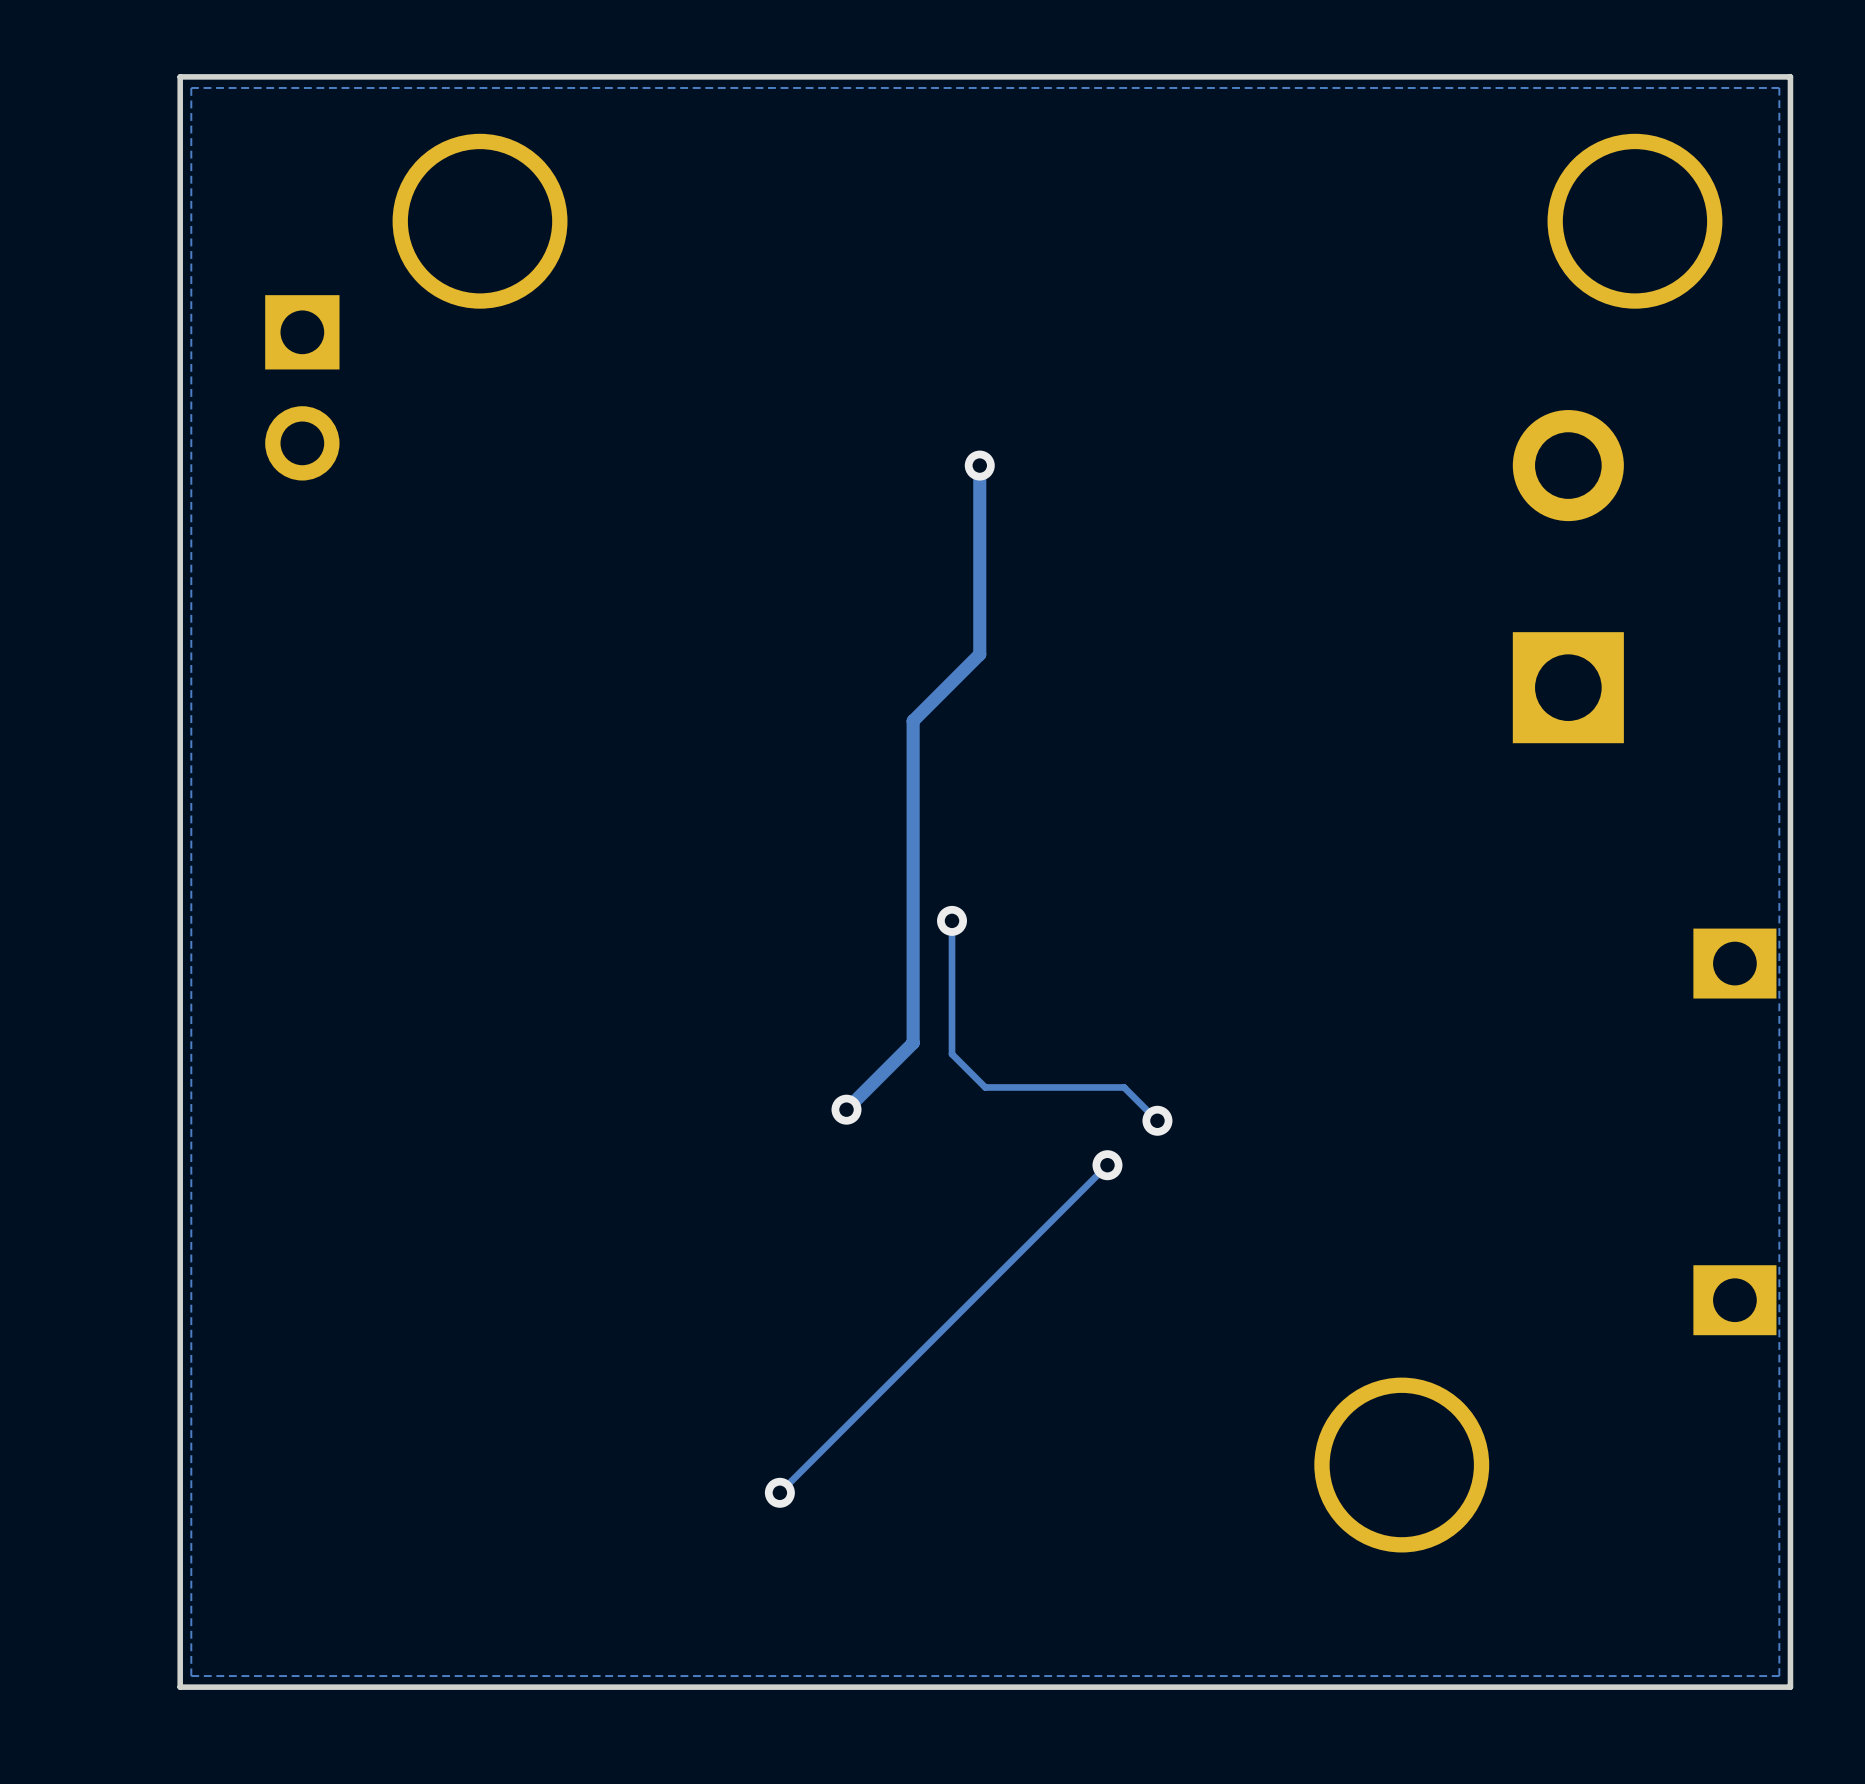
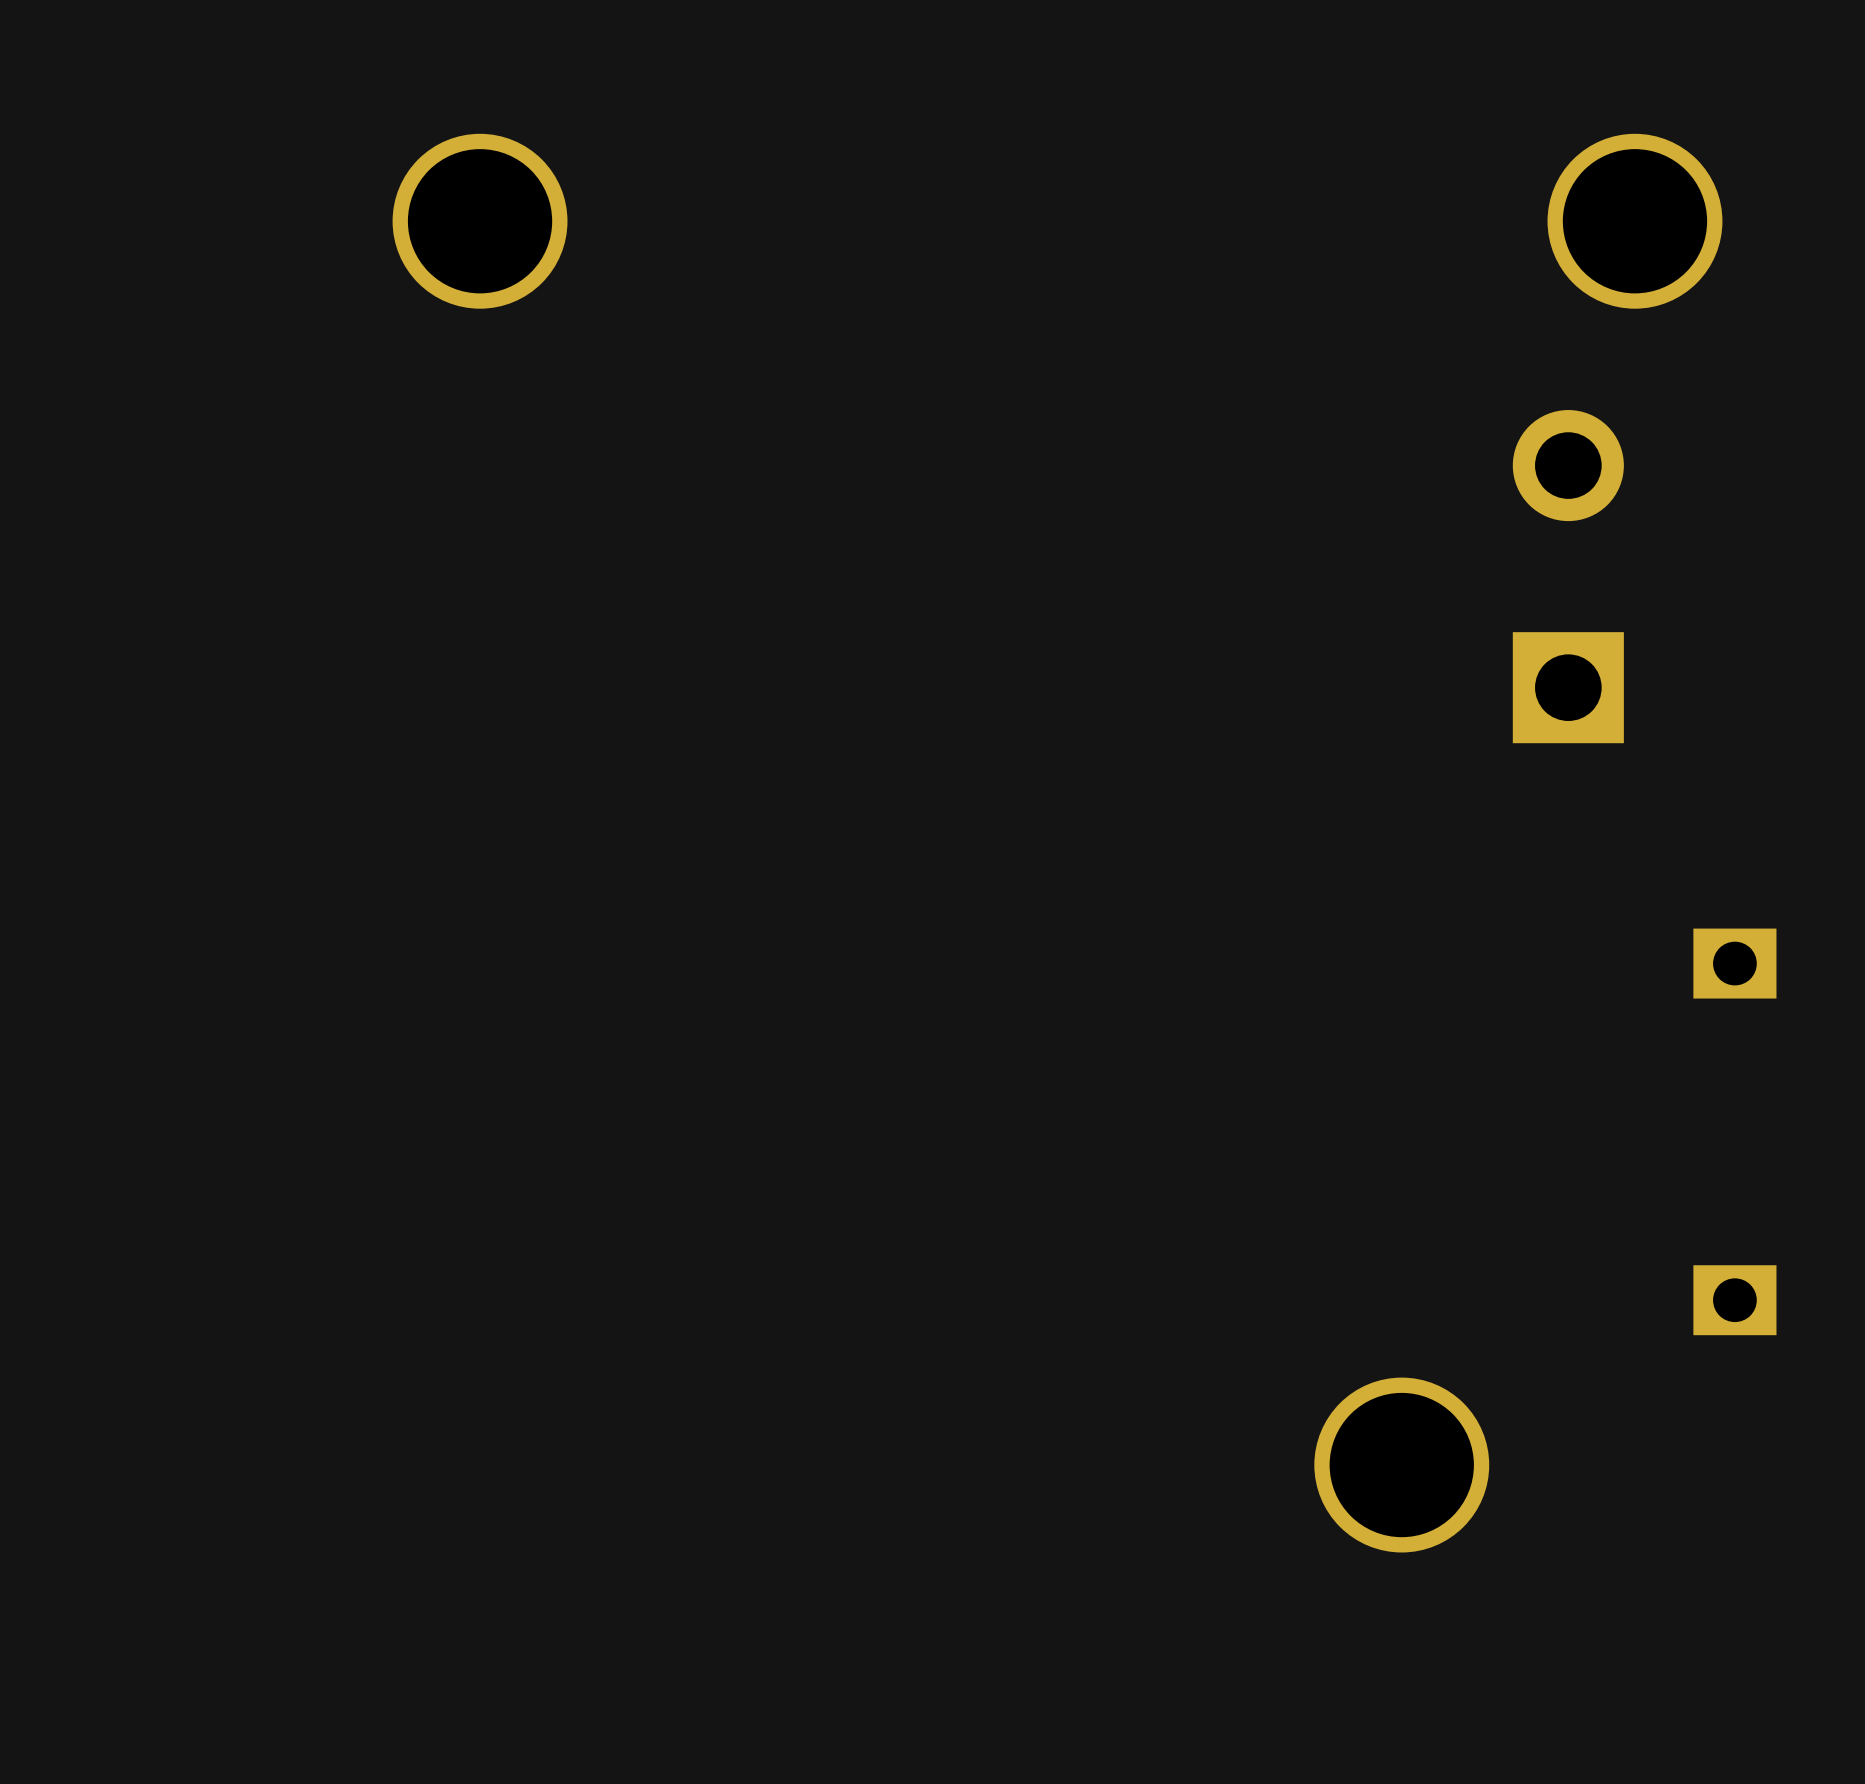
board edge: (1790, 76) (180, 76) (180, 1687) (1790, 1687) (1790, 76) -> none
zone outline: (1779, 87) (1779, 1676) (191, 1676) (191, 87) (1779, 87) -> none
part: (302, 387) -> none
track: (979, 465) (979, 654) (913, 720) (913, 1043) (846, 1109) -> none
via: (979, 465) -> none
track: (952, 920) (952, 1054) (985, 1087) (1124, 1087) (1157, 1120) -> none
via: (952, 920) -> none
via: (846, 1109) -> none
via: (1157, 1120) -> none
track: (1107, 1165) (779, 1492) -> none
via: (1107, 1165) -> none
via: (779, 1492) -> none

